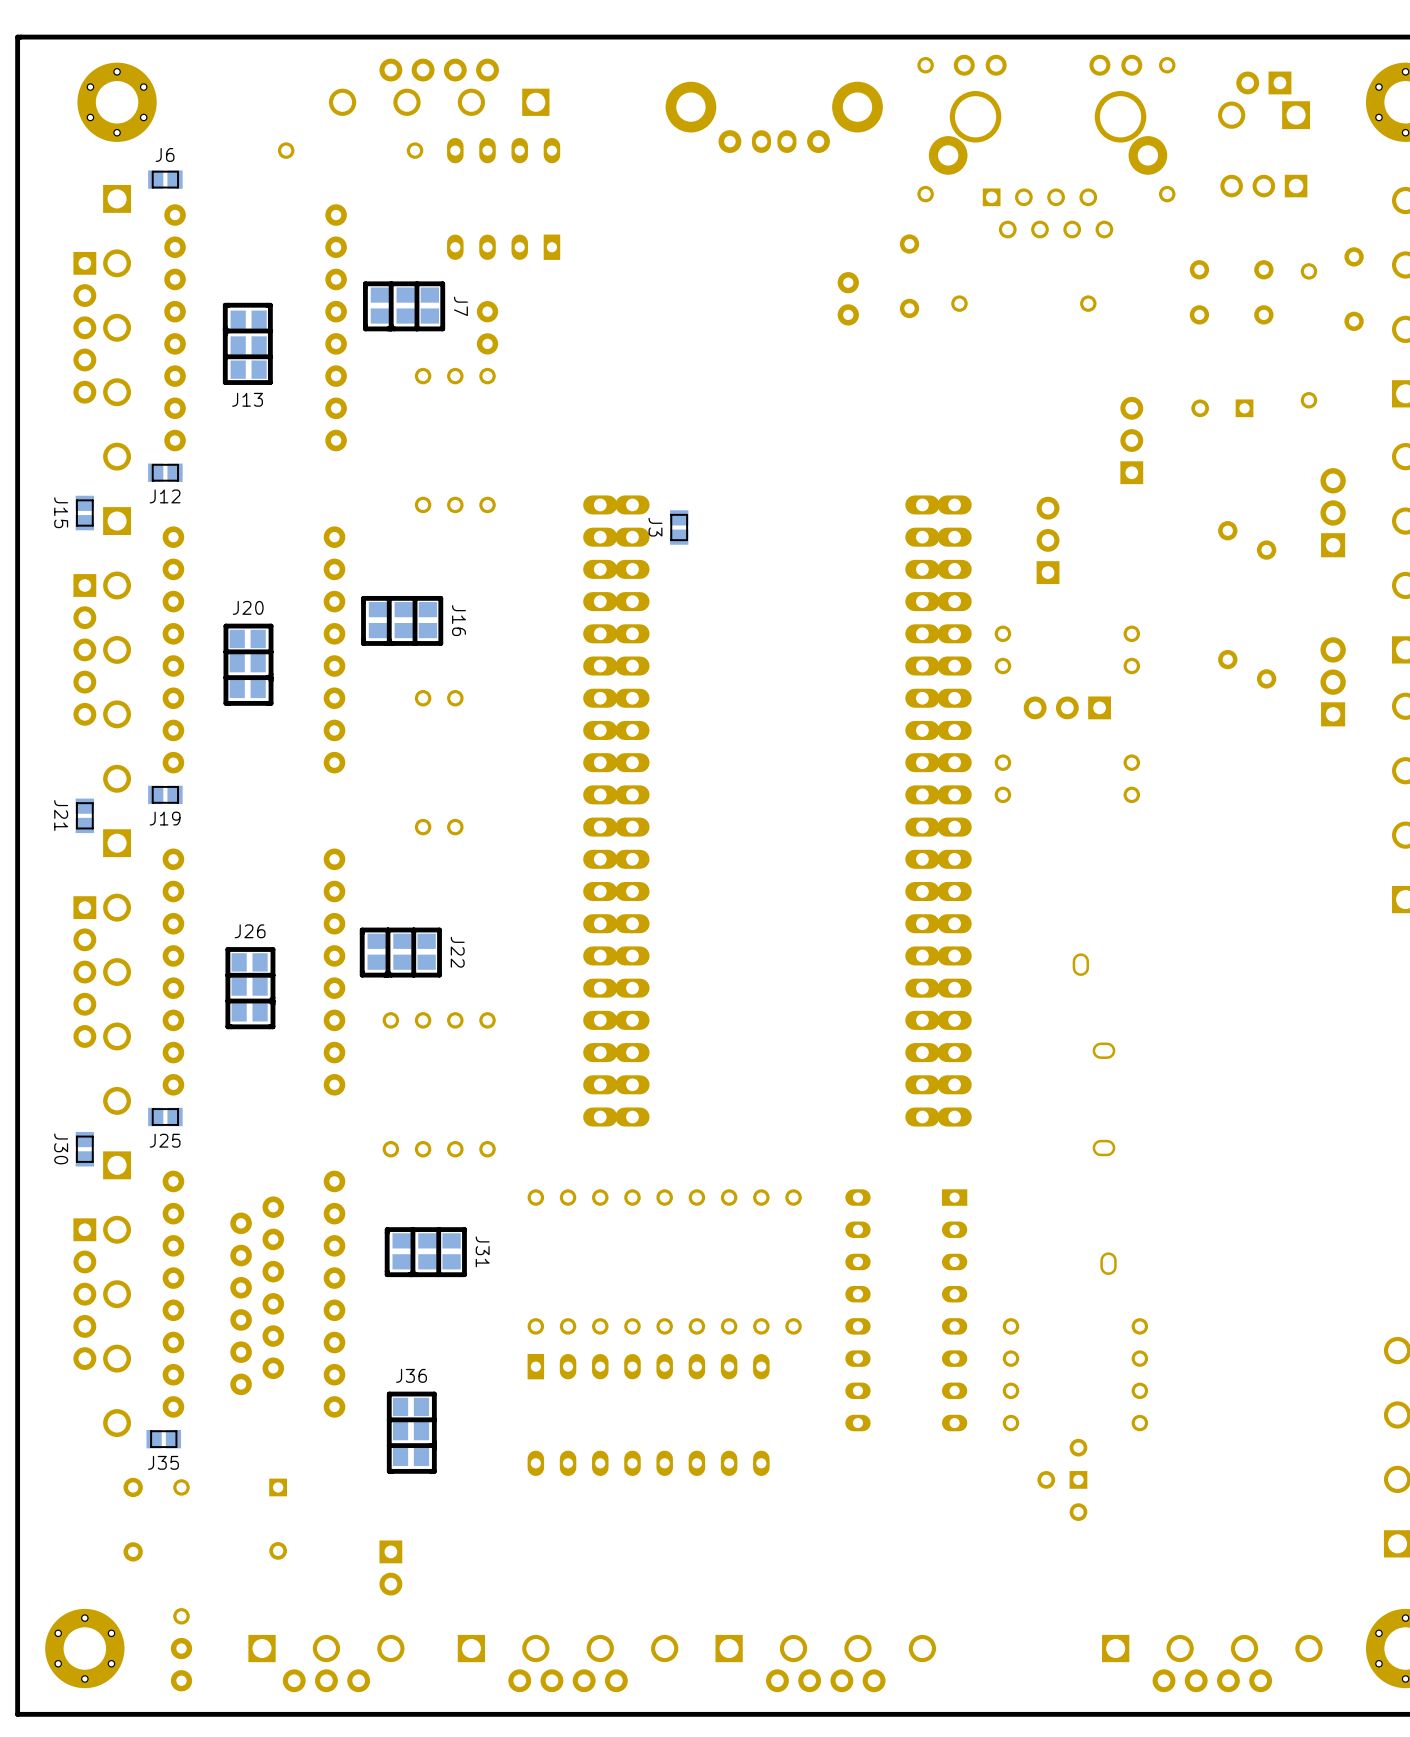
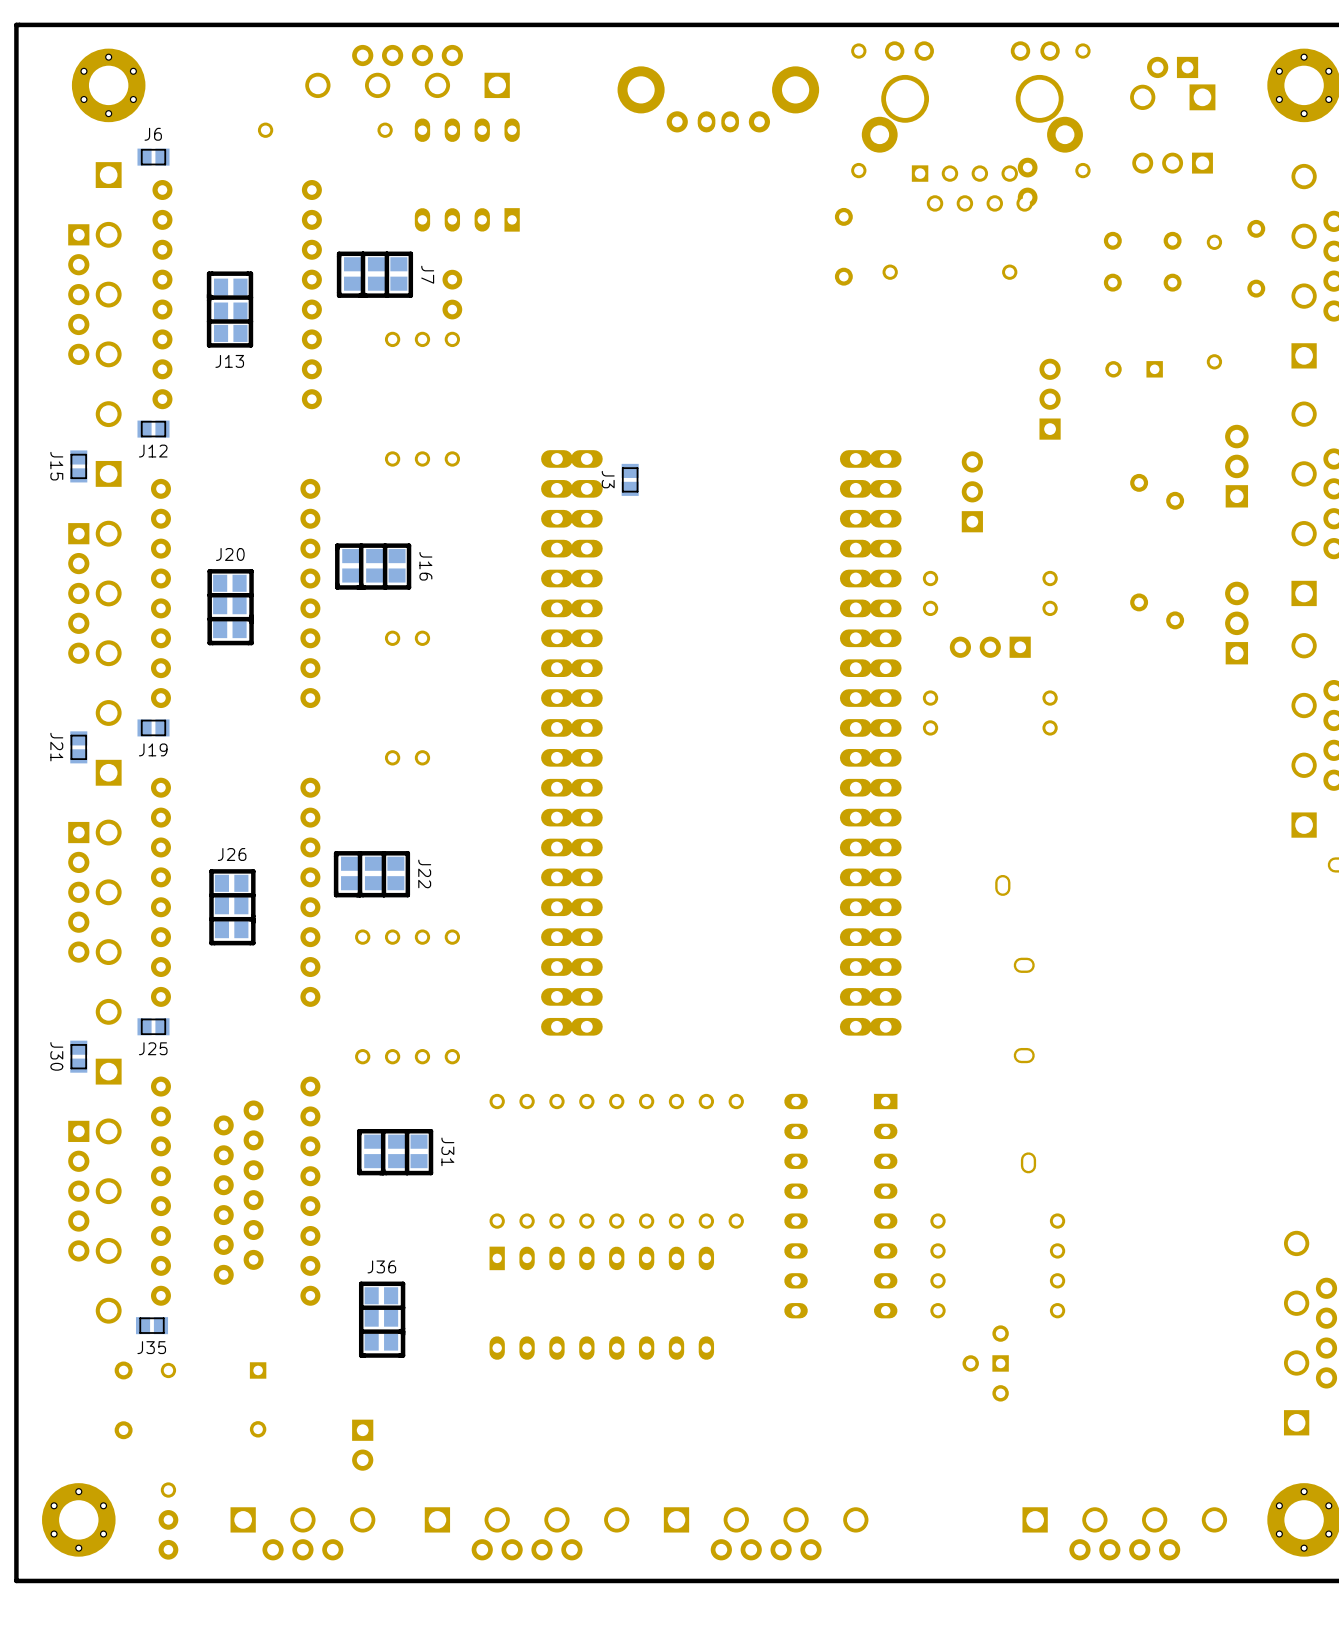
part position: (848, 298) -> (1027, 182)

